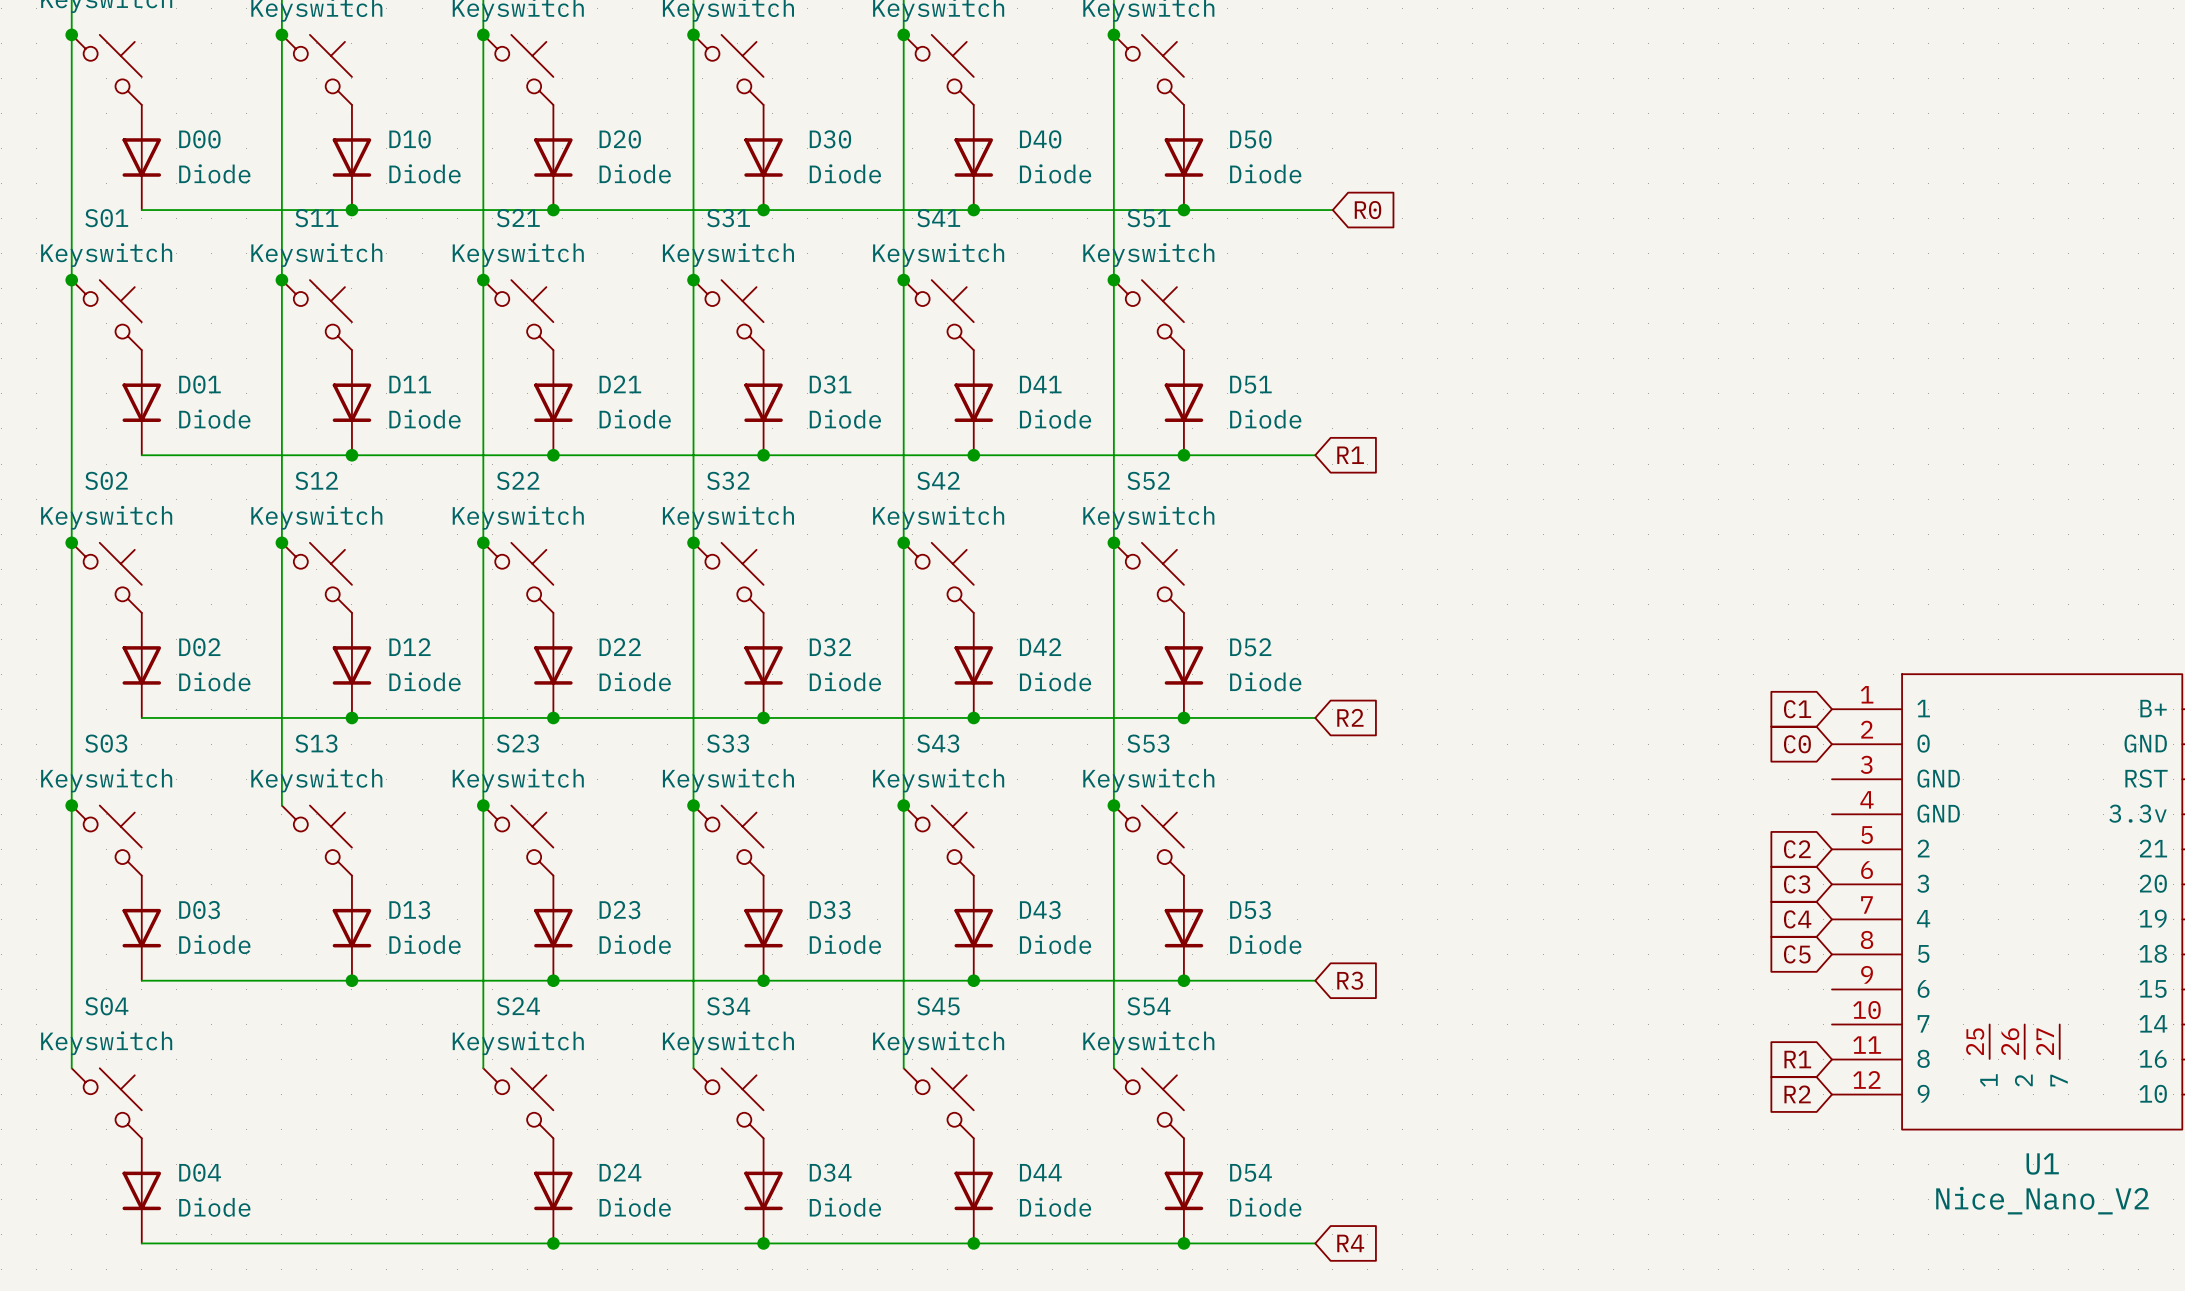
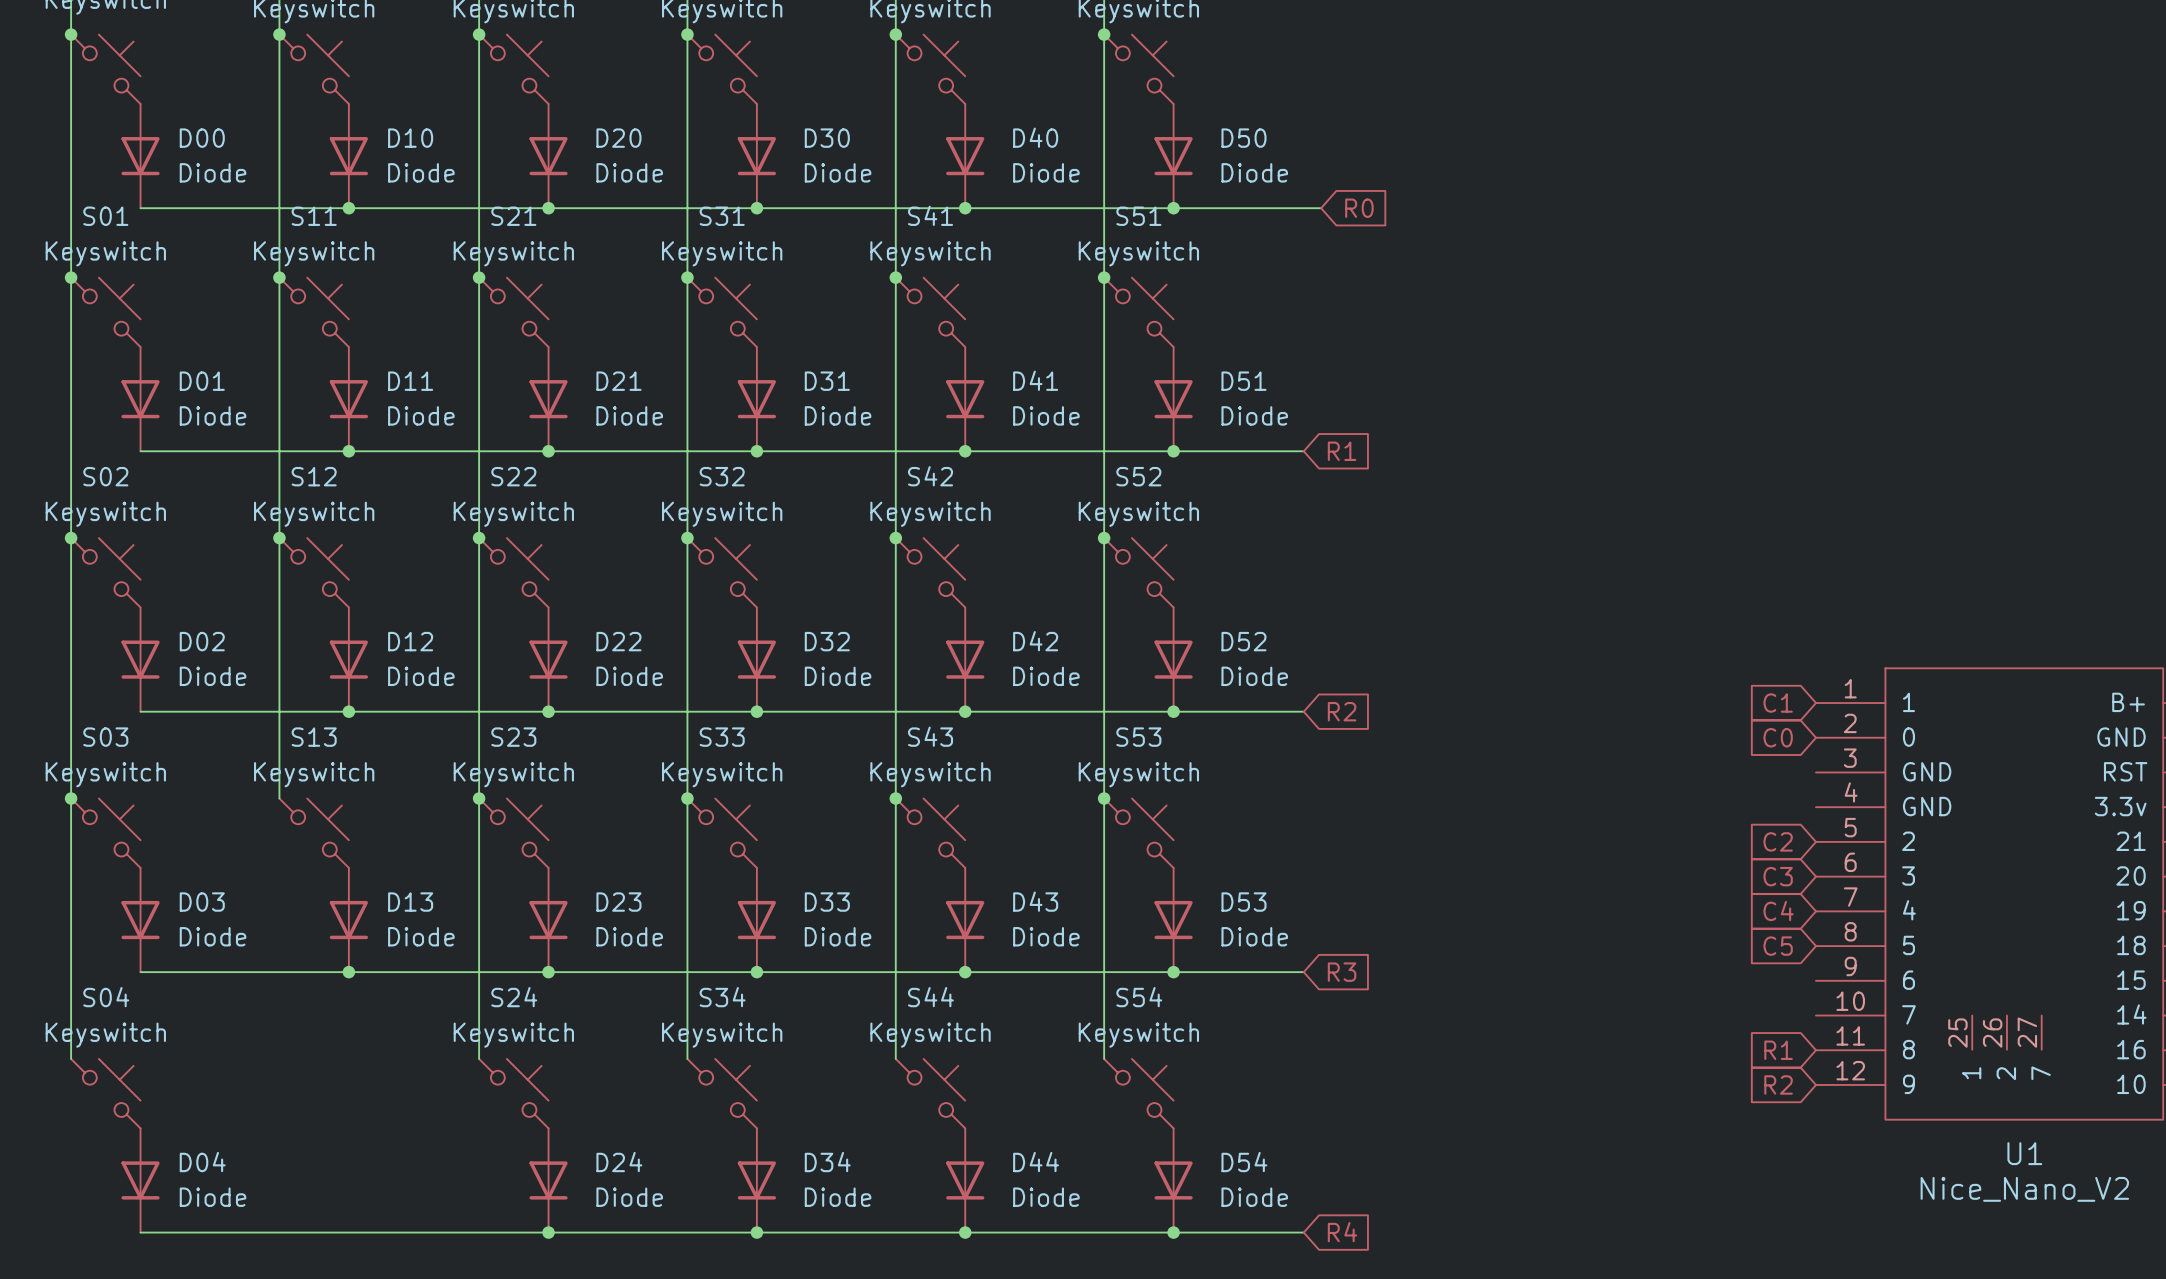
S45 name: S45 (938, 1006) -> S44 (930, 997)

